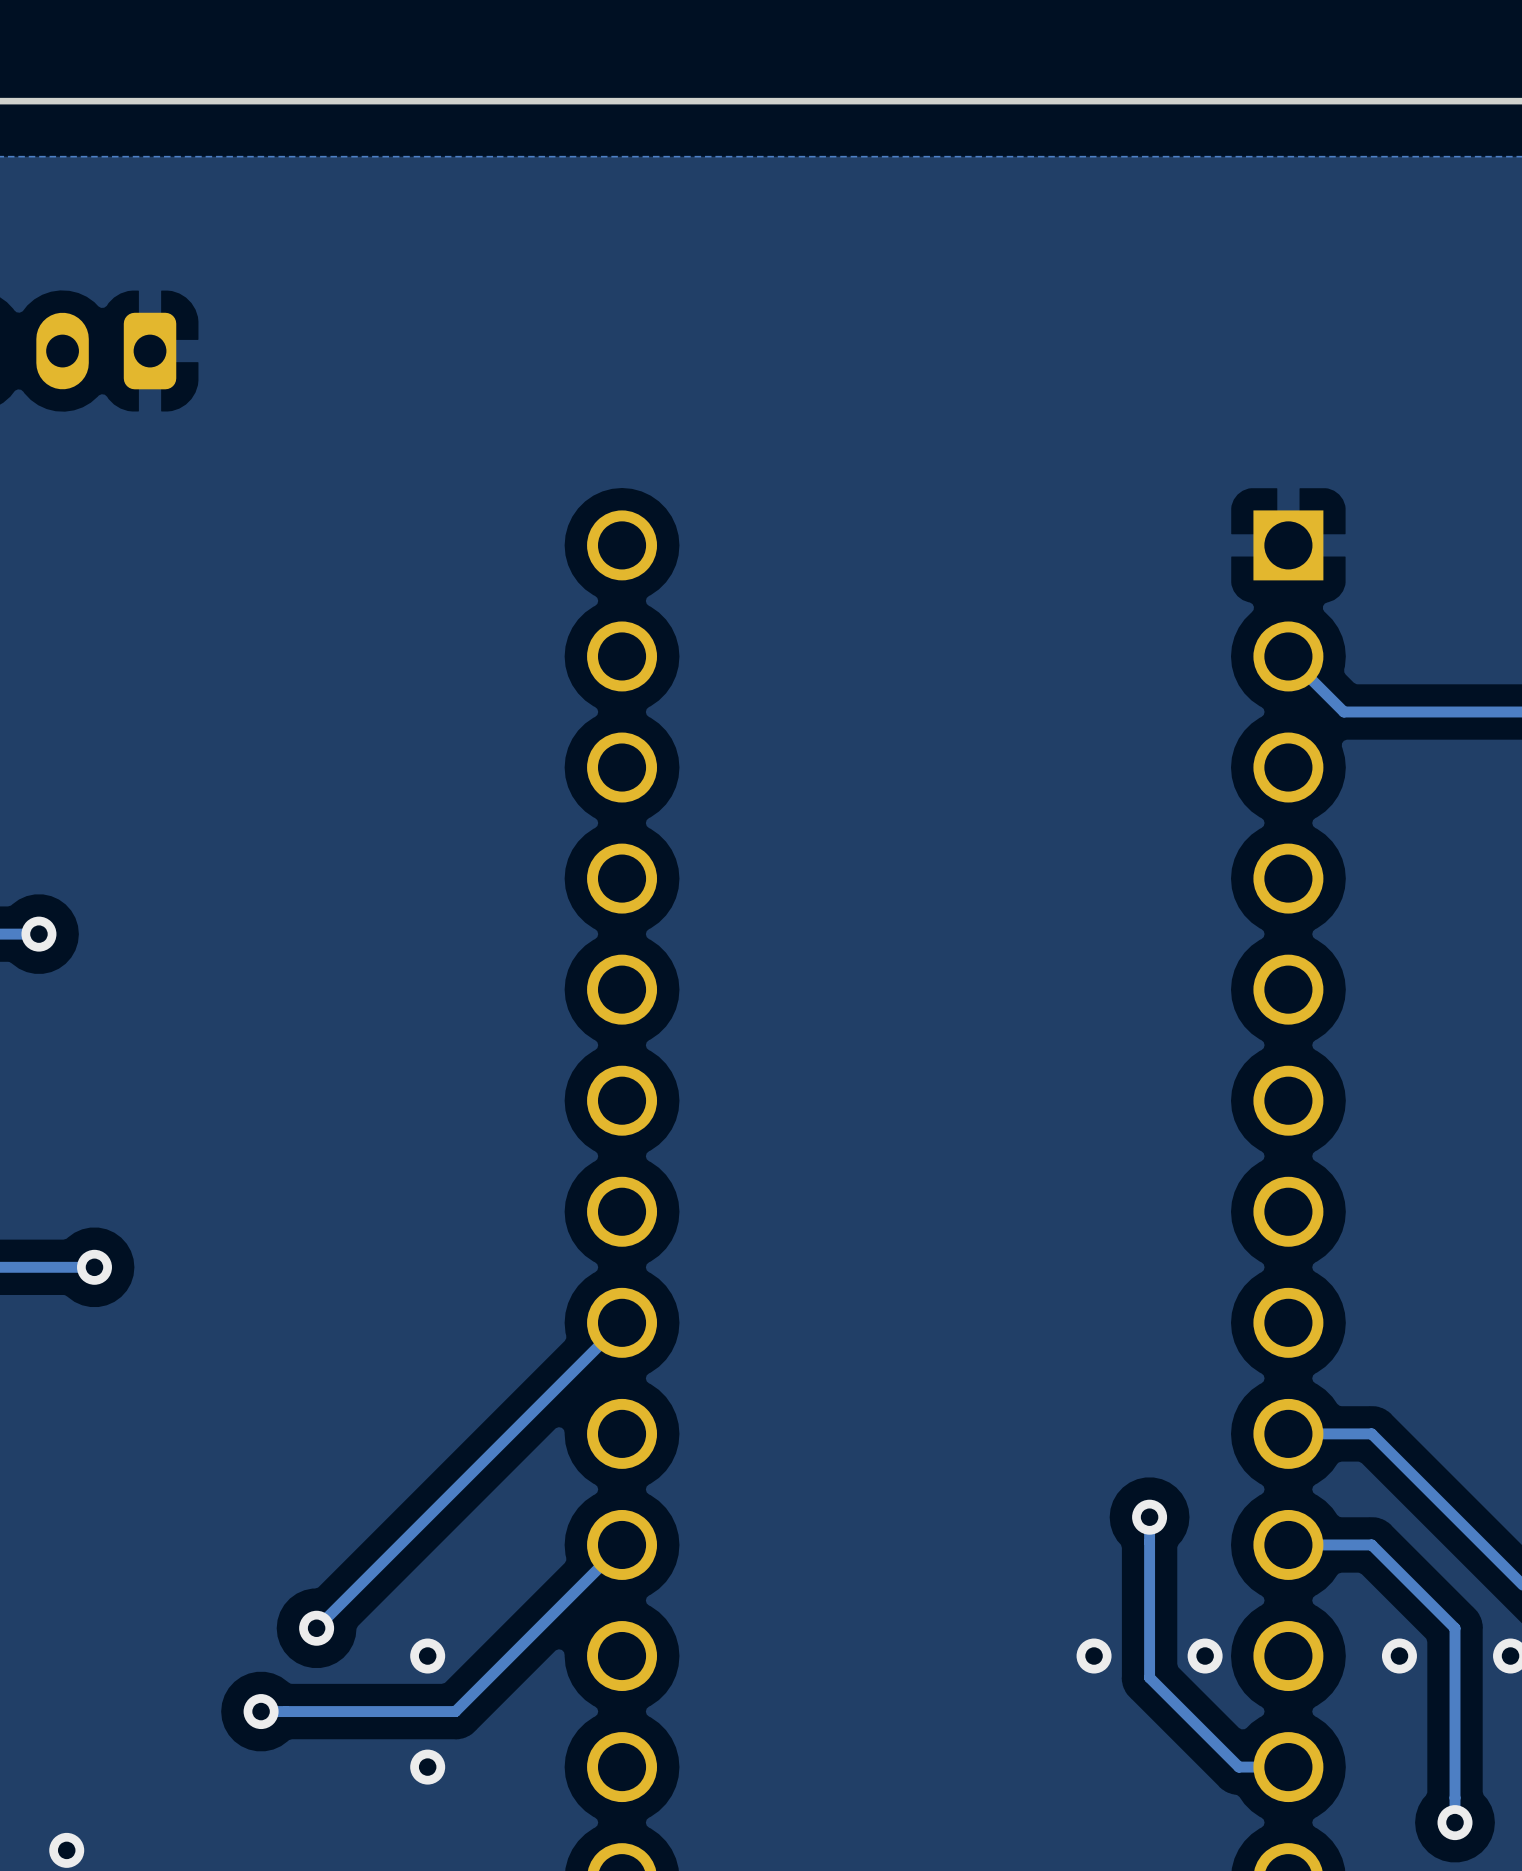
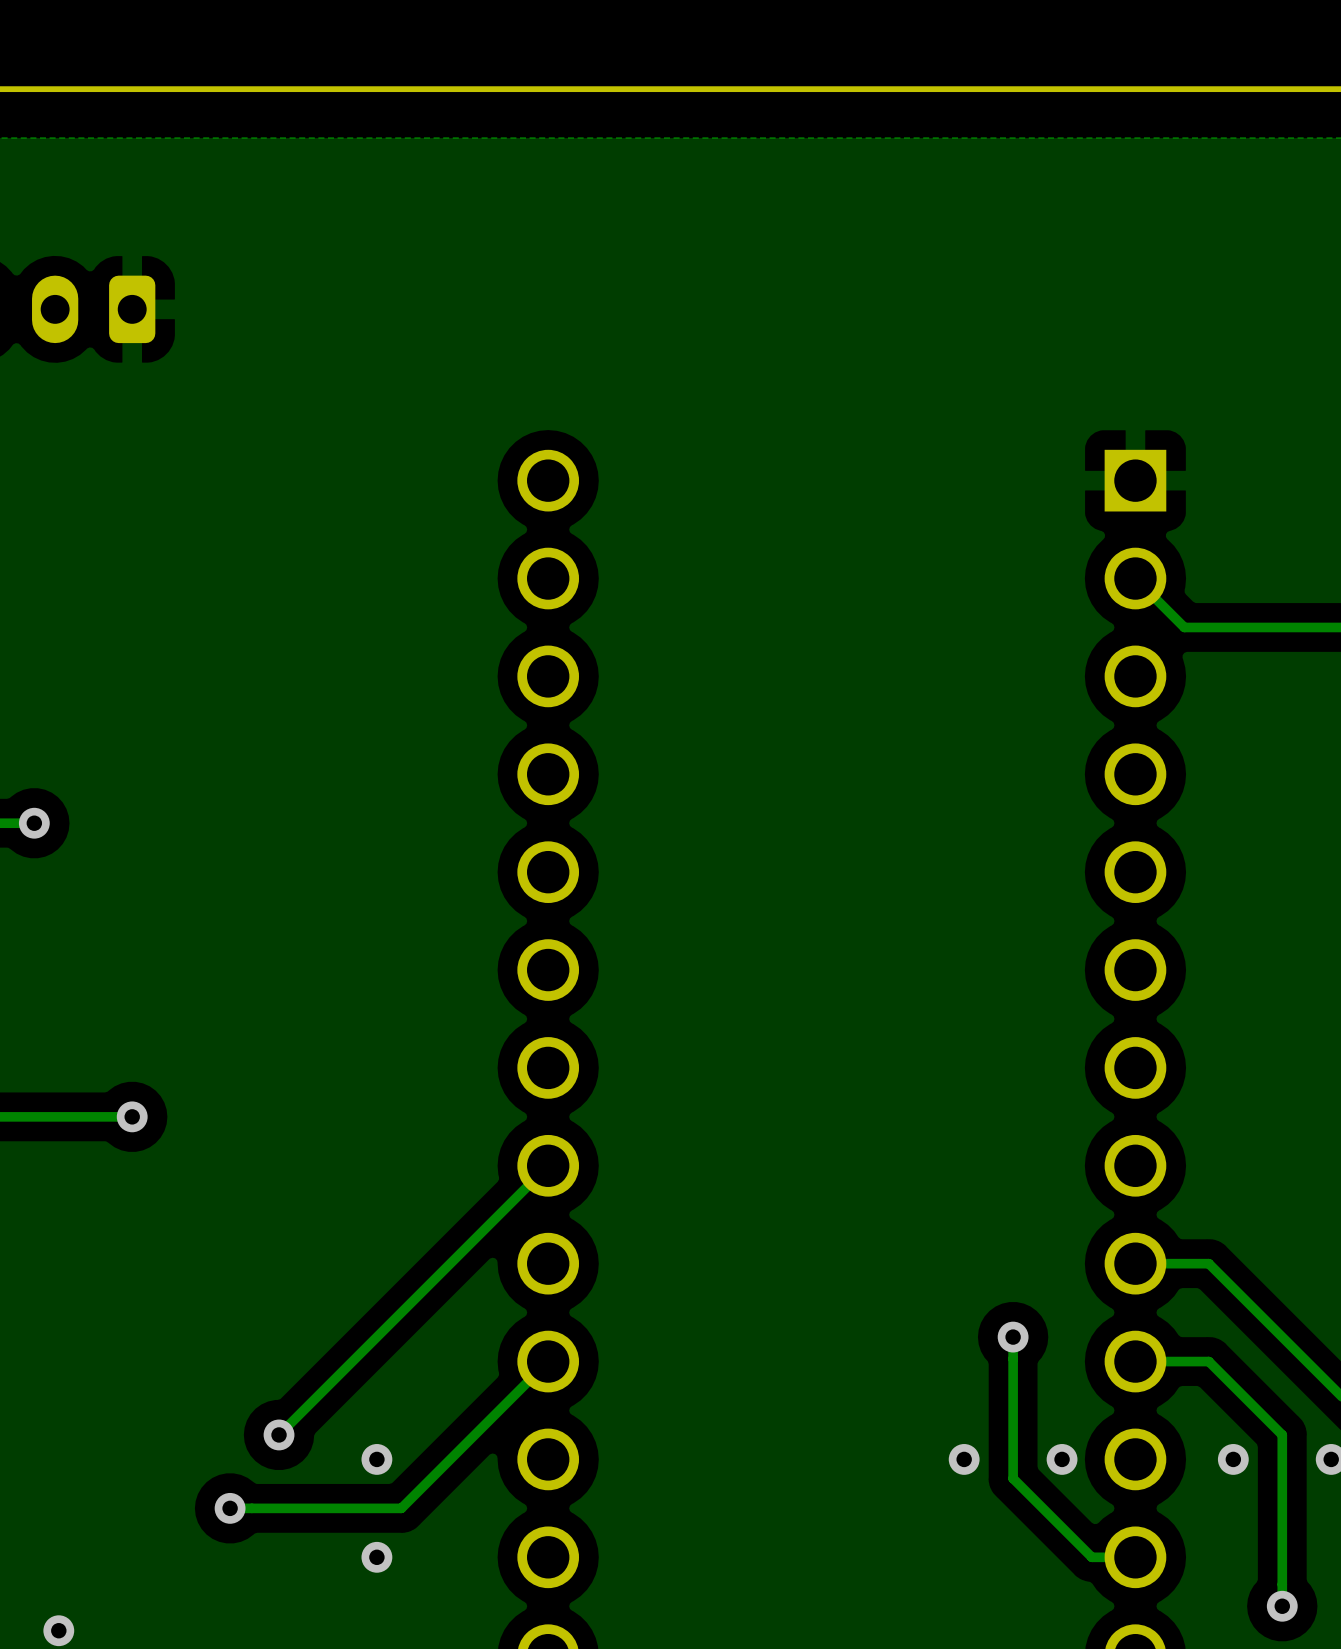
via position: (94, 1267) -> (132, 1116)
track: none -> (132, 1116) (83, 1116)

